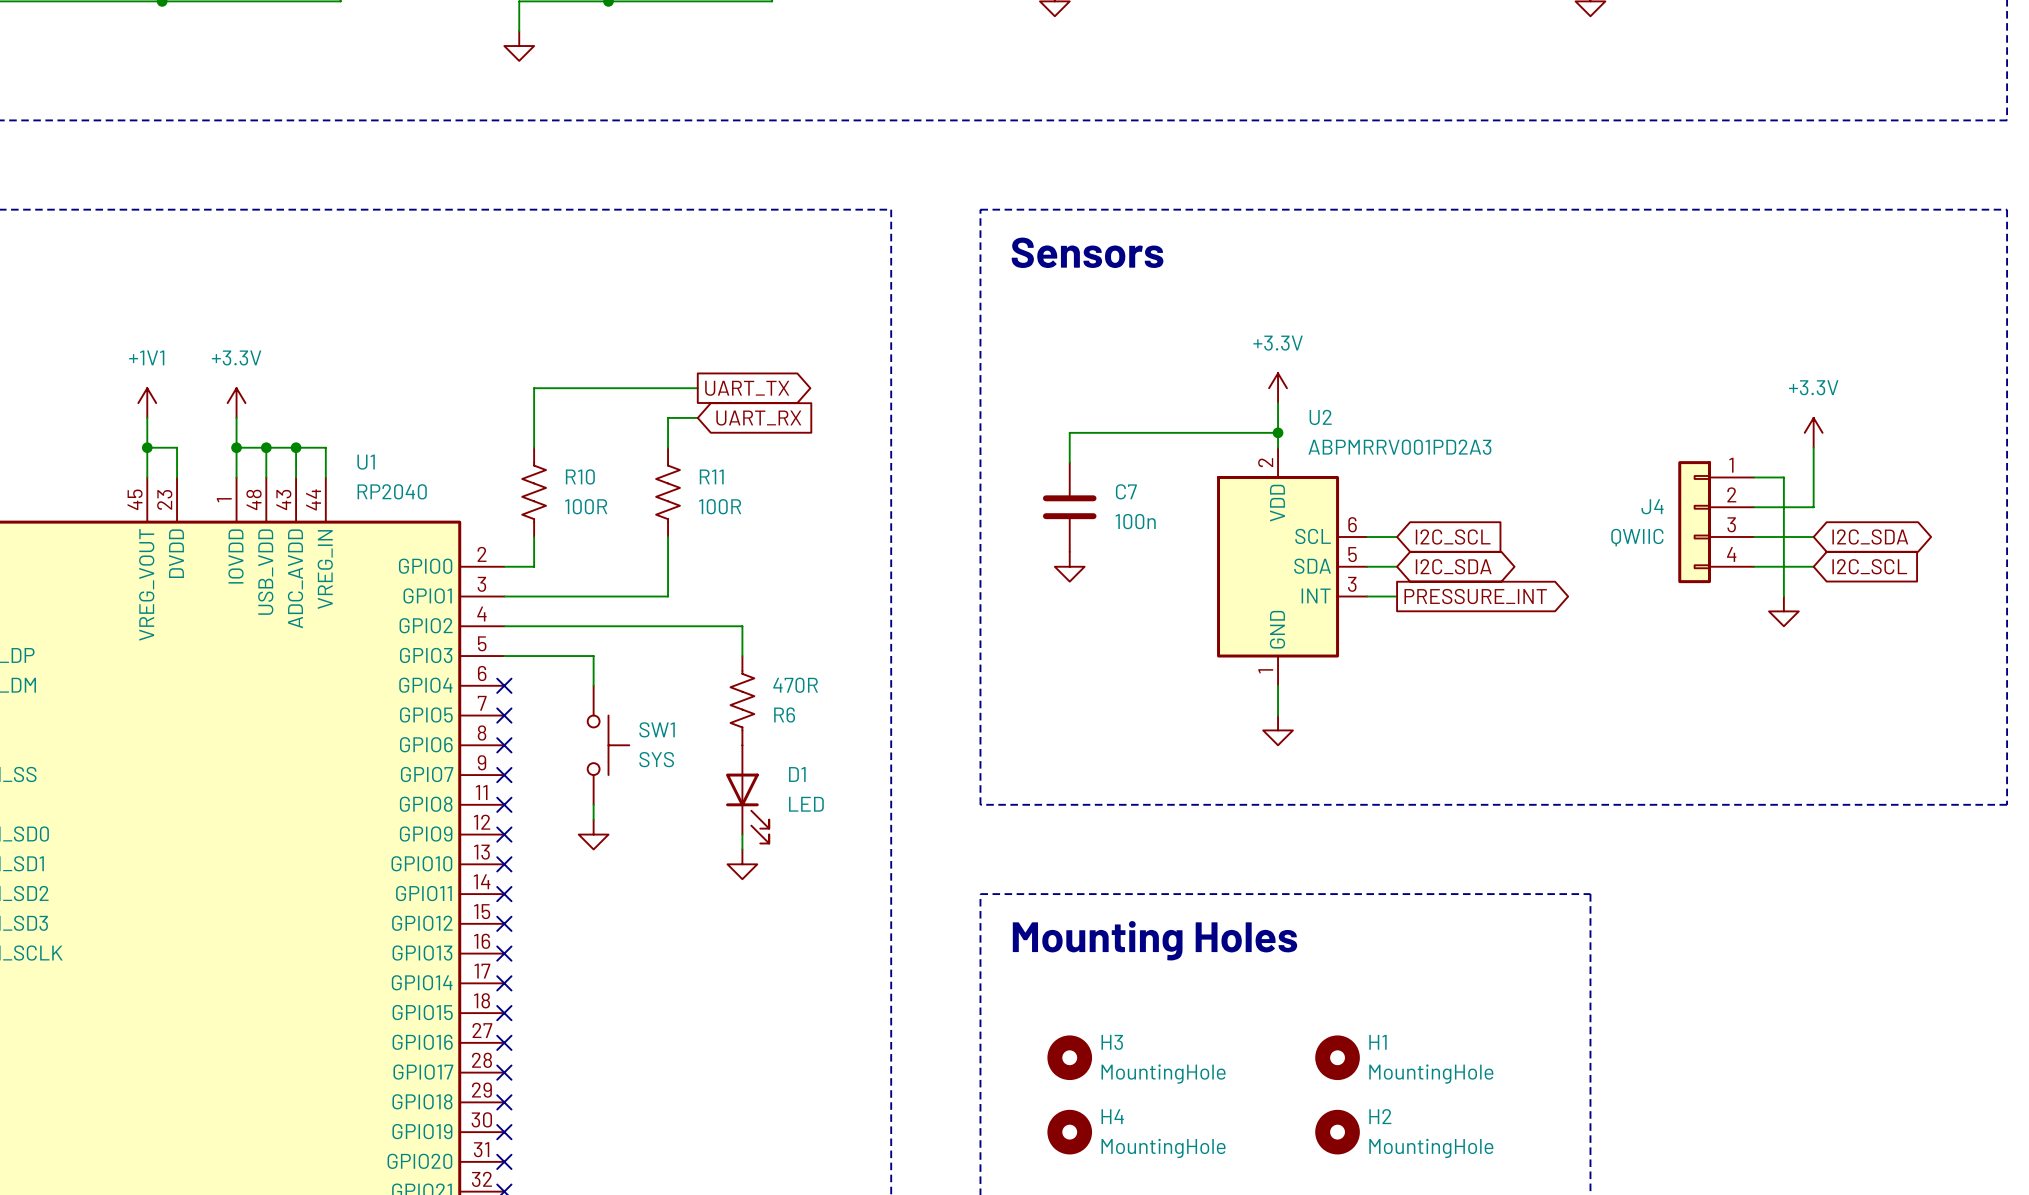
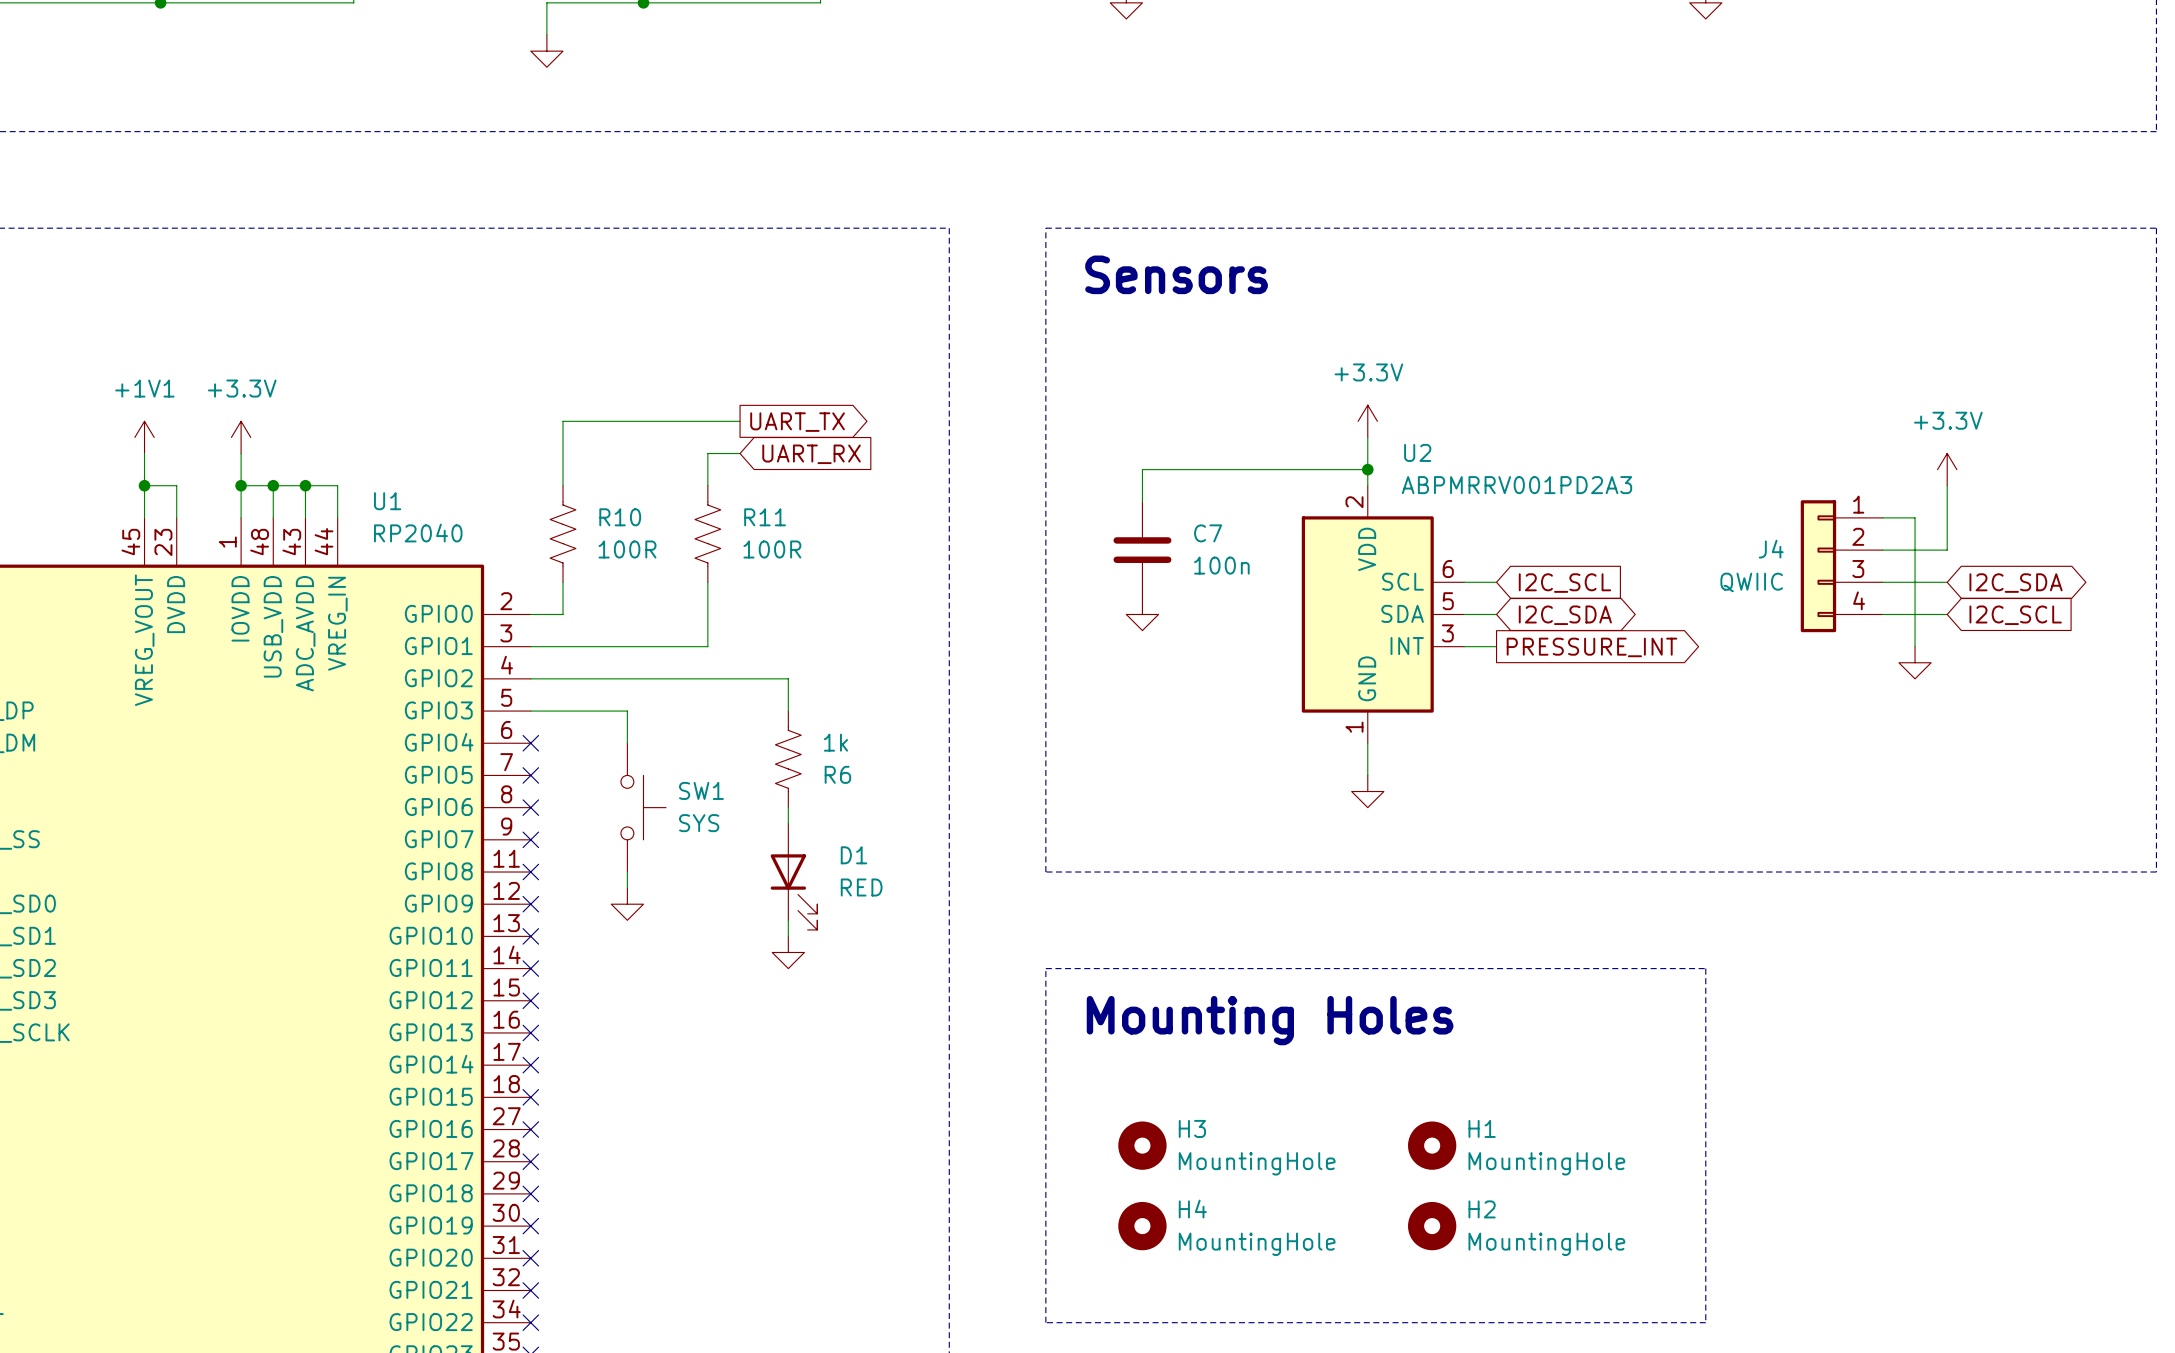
R6 value: 470R (795, 685) -> 1k (835, 742)
D1 position: (747, 794) -> (793, 876)
D1 value: LED (806, 804) -> RED (861, 887)
power symbol position: (742, 864) -> (788, 952)

